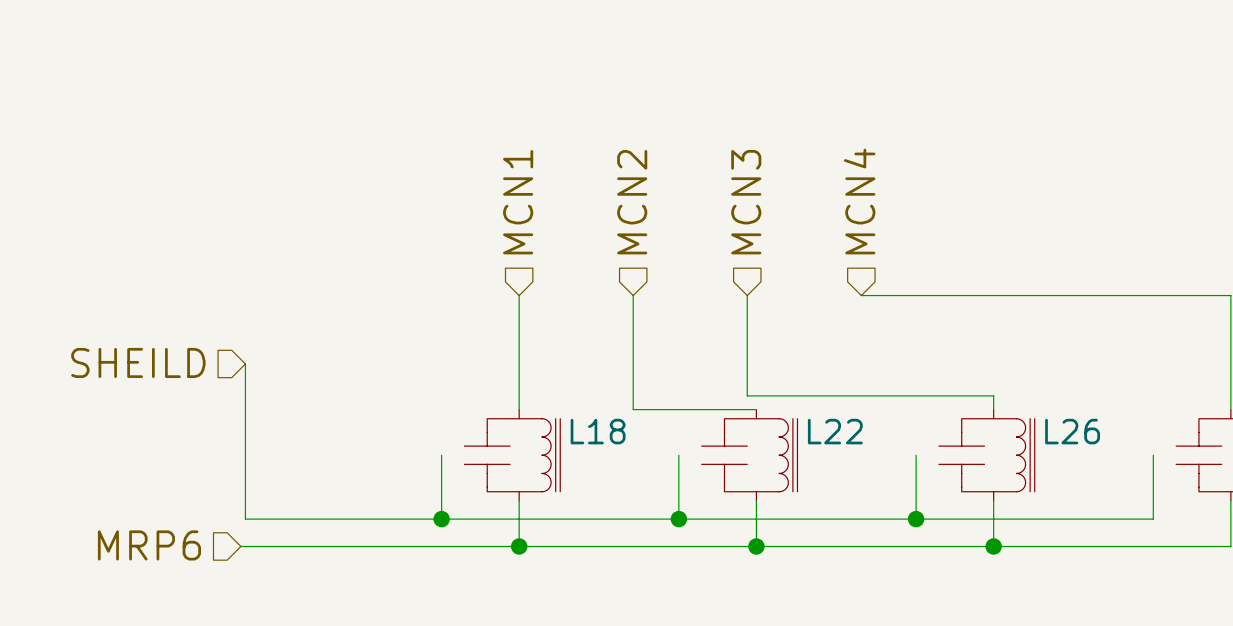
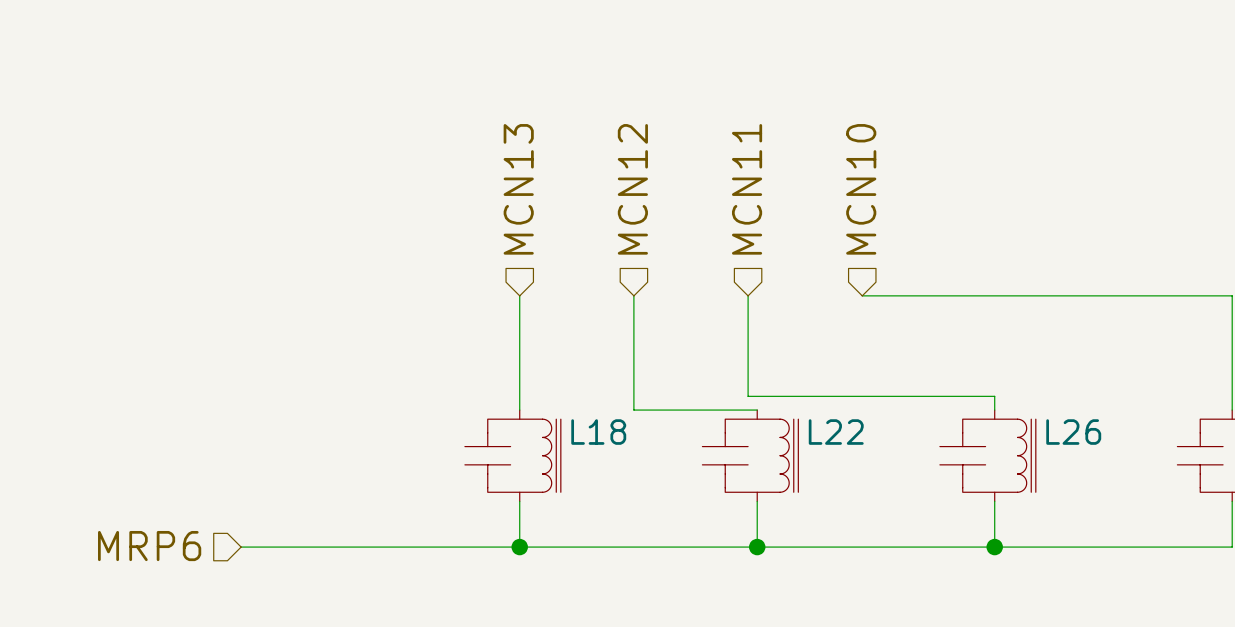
hierarchical label: MCN4 (859, 201) -> MCN10 (861, 189)
hierarchical label: MCN1 (518, 202) -> MCN13 (518, 189)
hierarchical label: MCN2 (632, 202) -> MCN12 (632, 189)
hierarchical label: MCN3 (746, 202) -> MCN11 (747, 189)
hierarchical label: SHEILD (138, 362) -> none
wire: (245, 363) (245, 519) (1153, 519) (1153, 455) -> none
wire: (441, 455) (441, 519) -> none
wire: (678, 455) (678, 519) -> none
wire: (916, 455) (916, 519) -> none
junction: (441, 519) -> none
junction: (678, 519) -> none
junction: (916, 519) -> none

